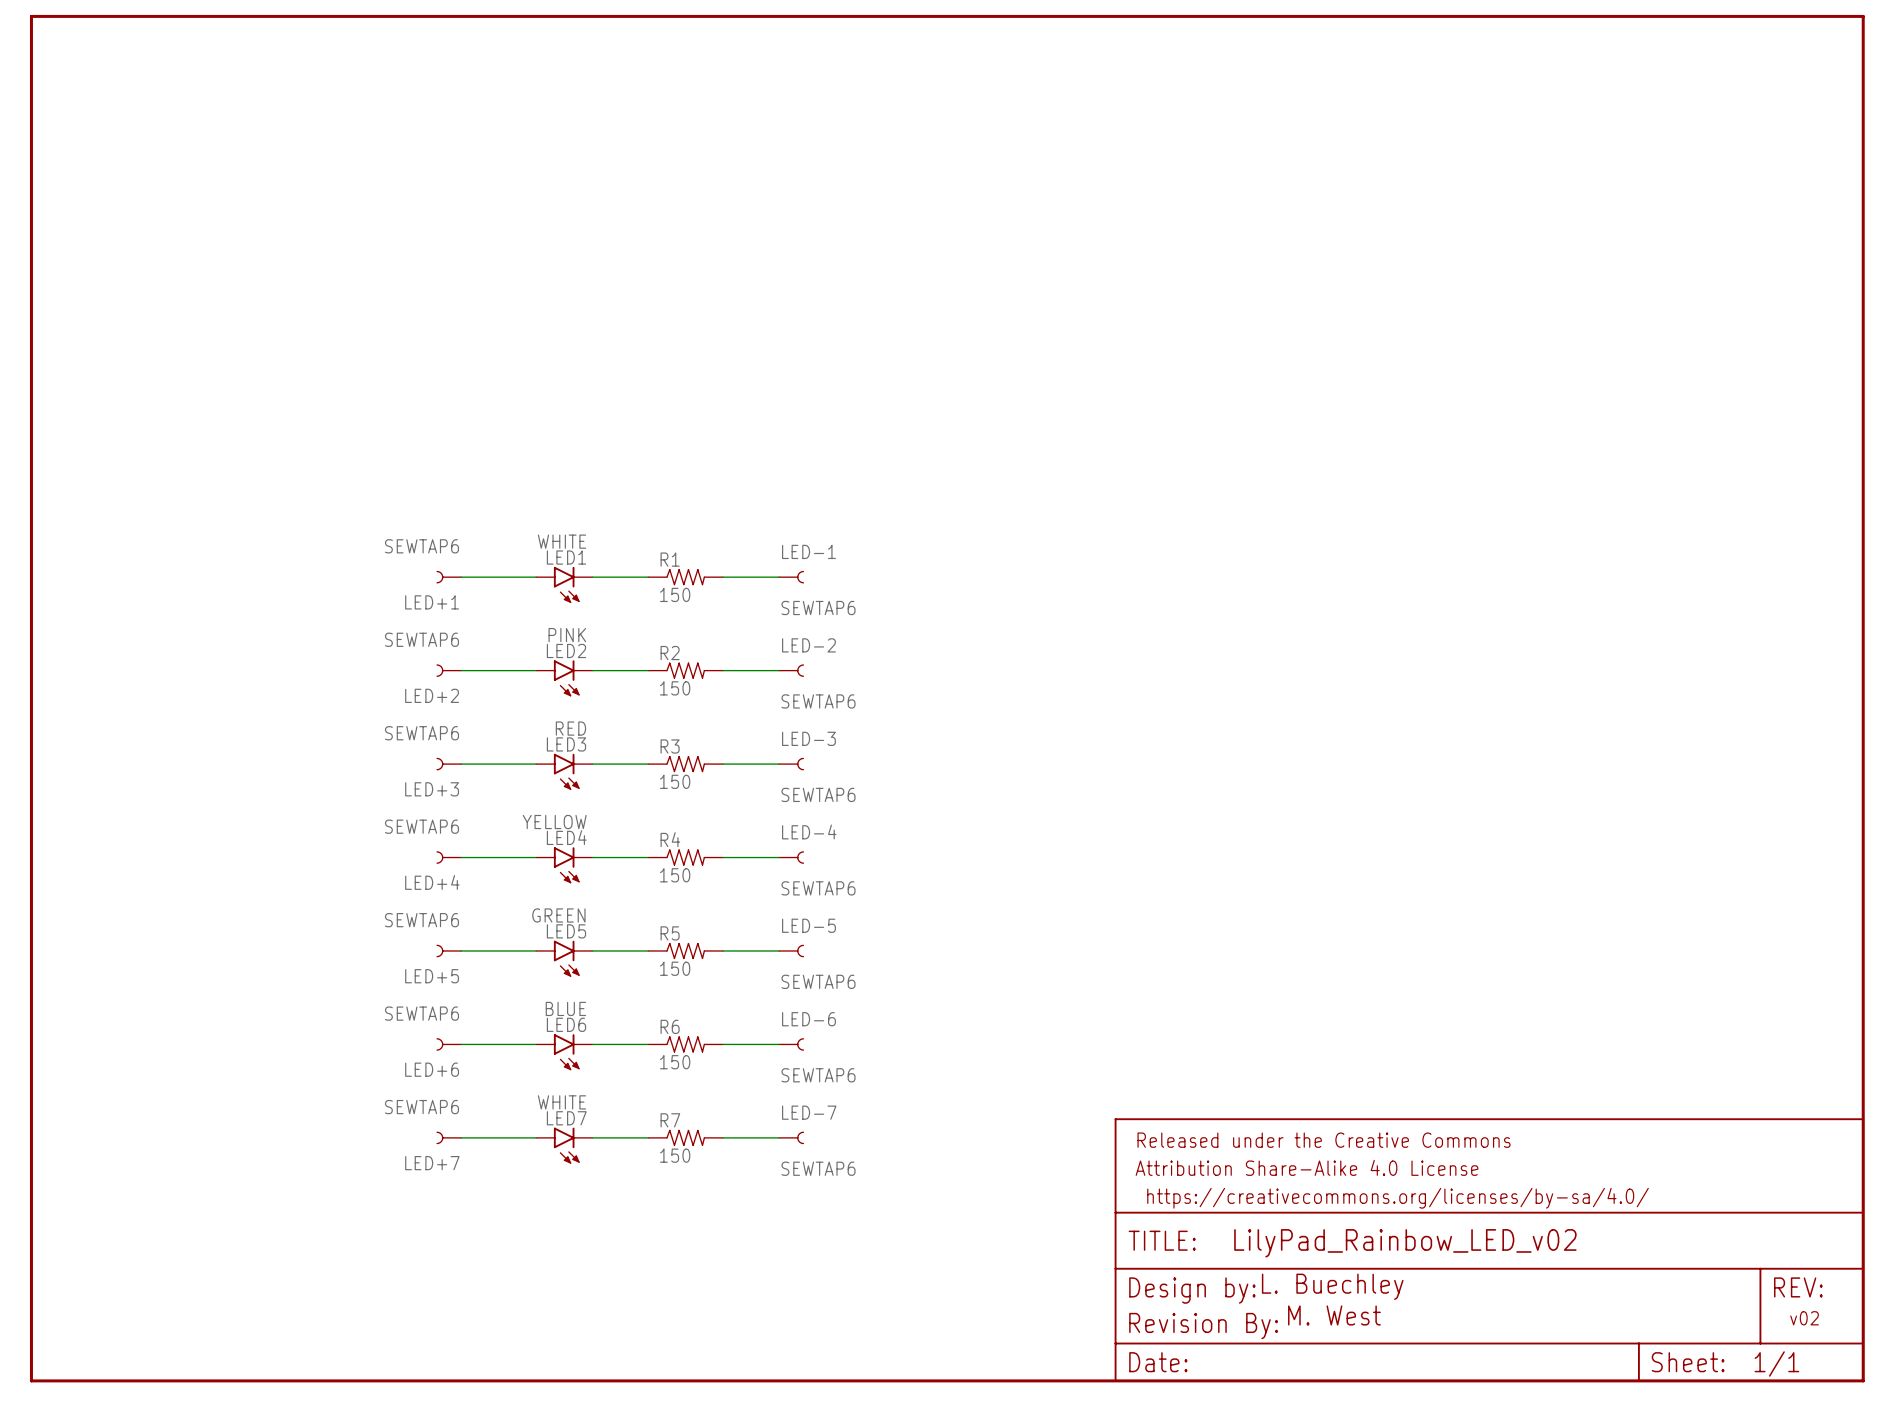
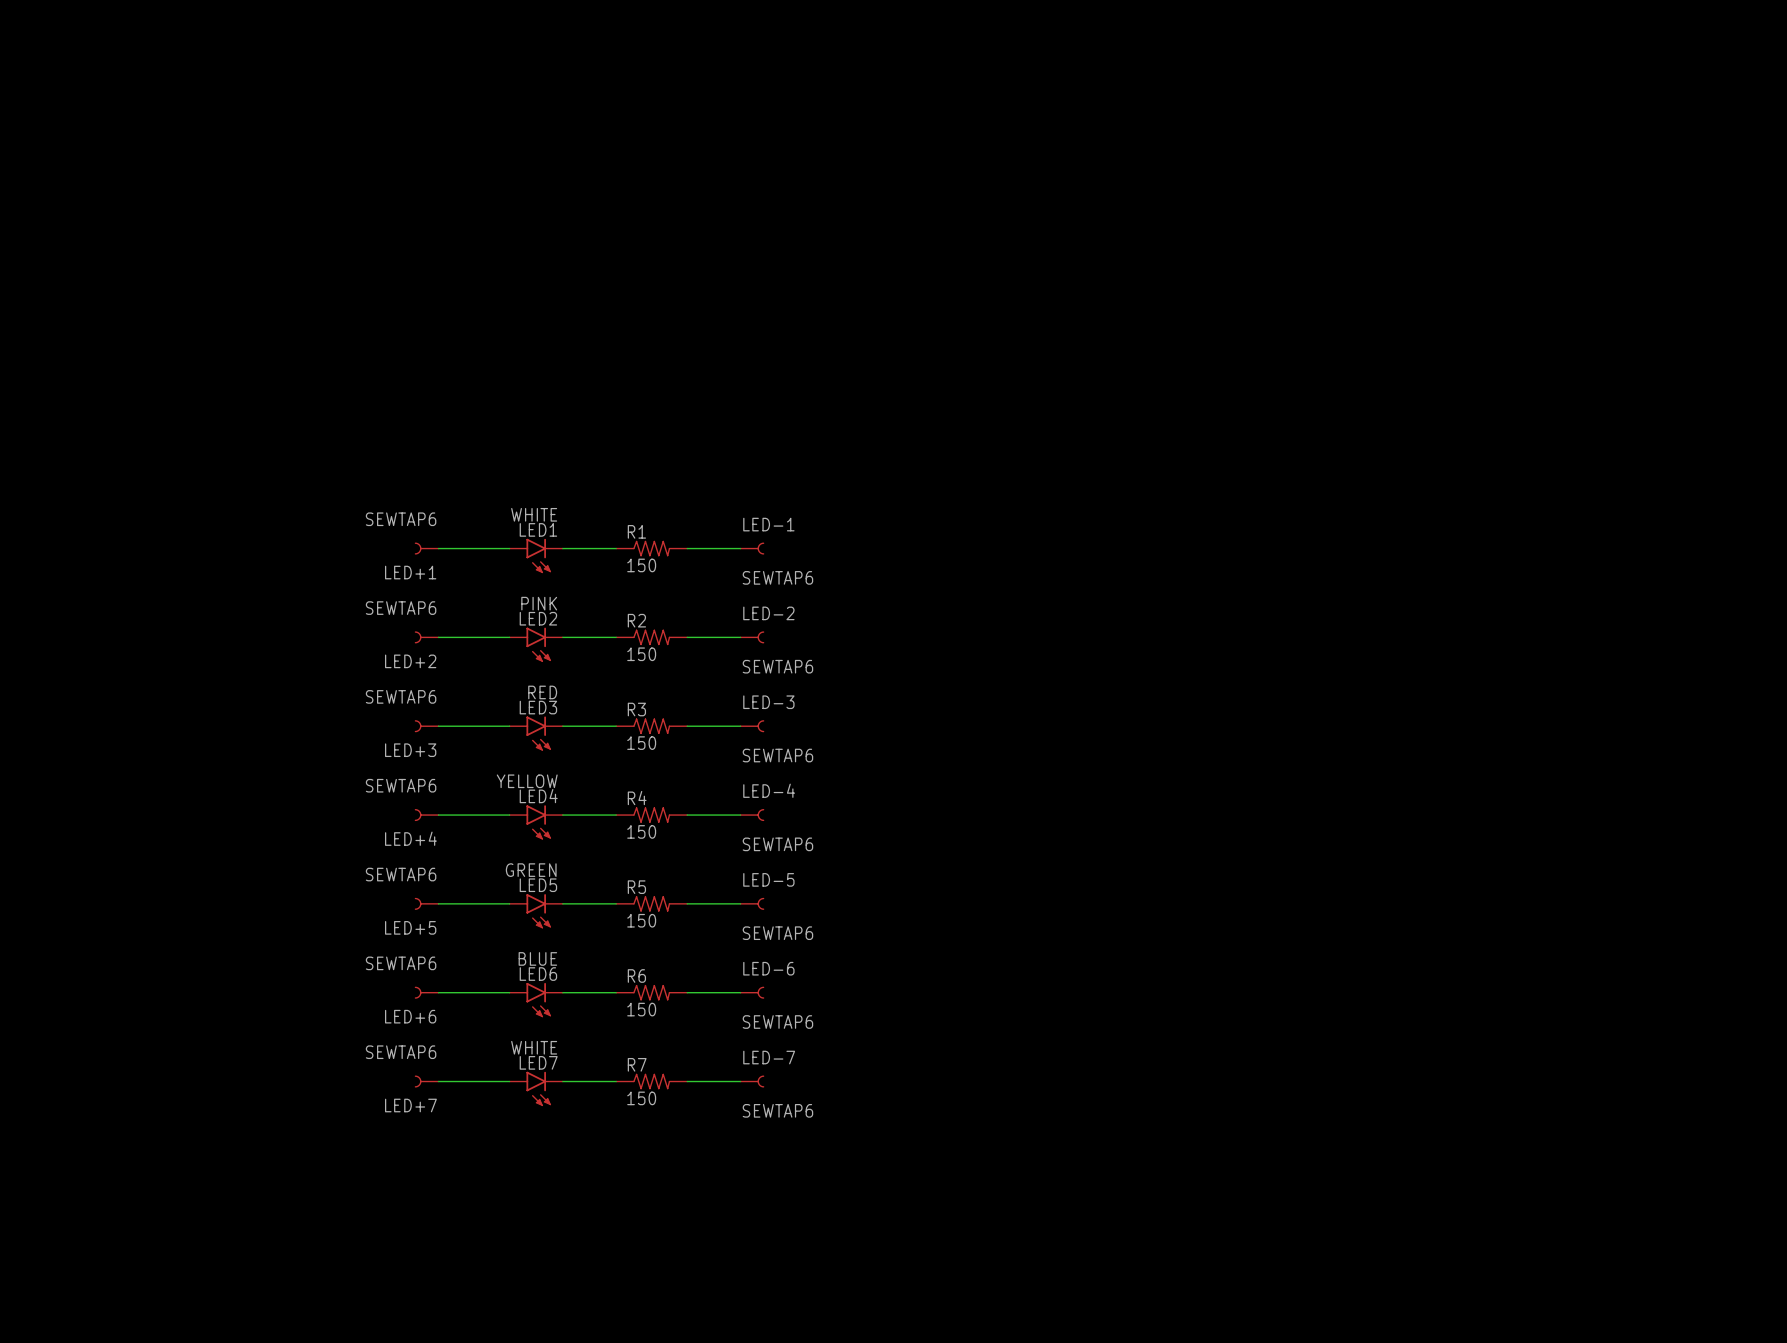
part: (947, 698) -> none
part: (1489, 1250) -> none
text: L. Buechley (1332, 1286) -> none
text: M. West (1334, 1315) -> none
text: v02 (1804, 1318) -> none
part: (1203, 1326) -> none

